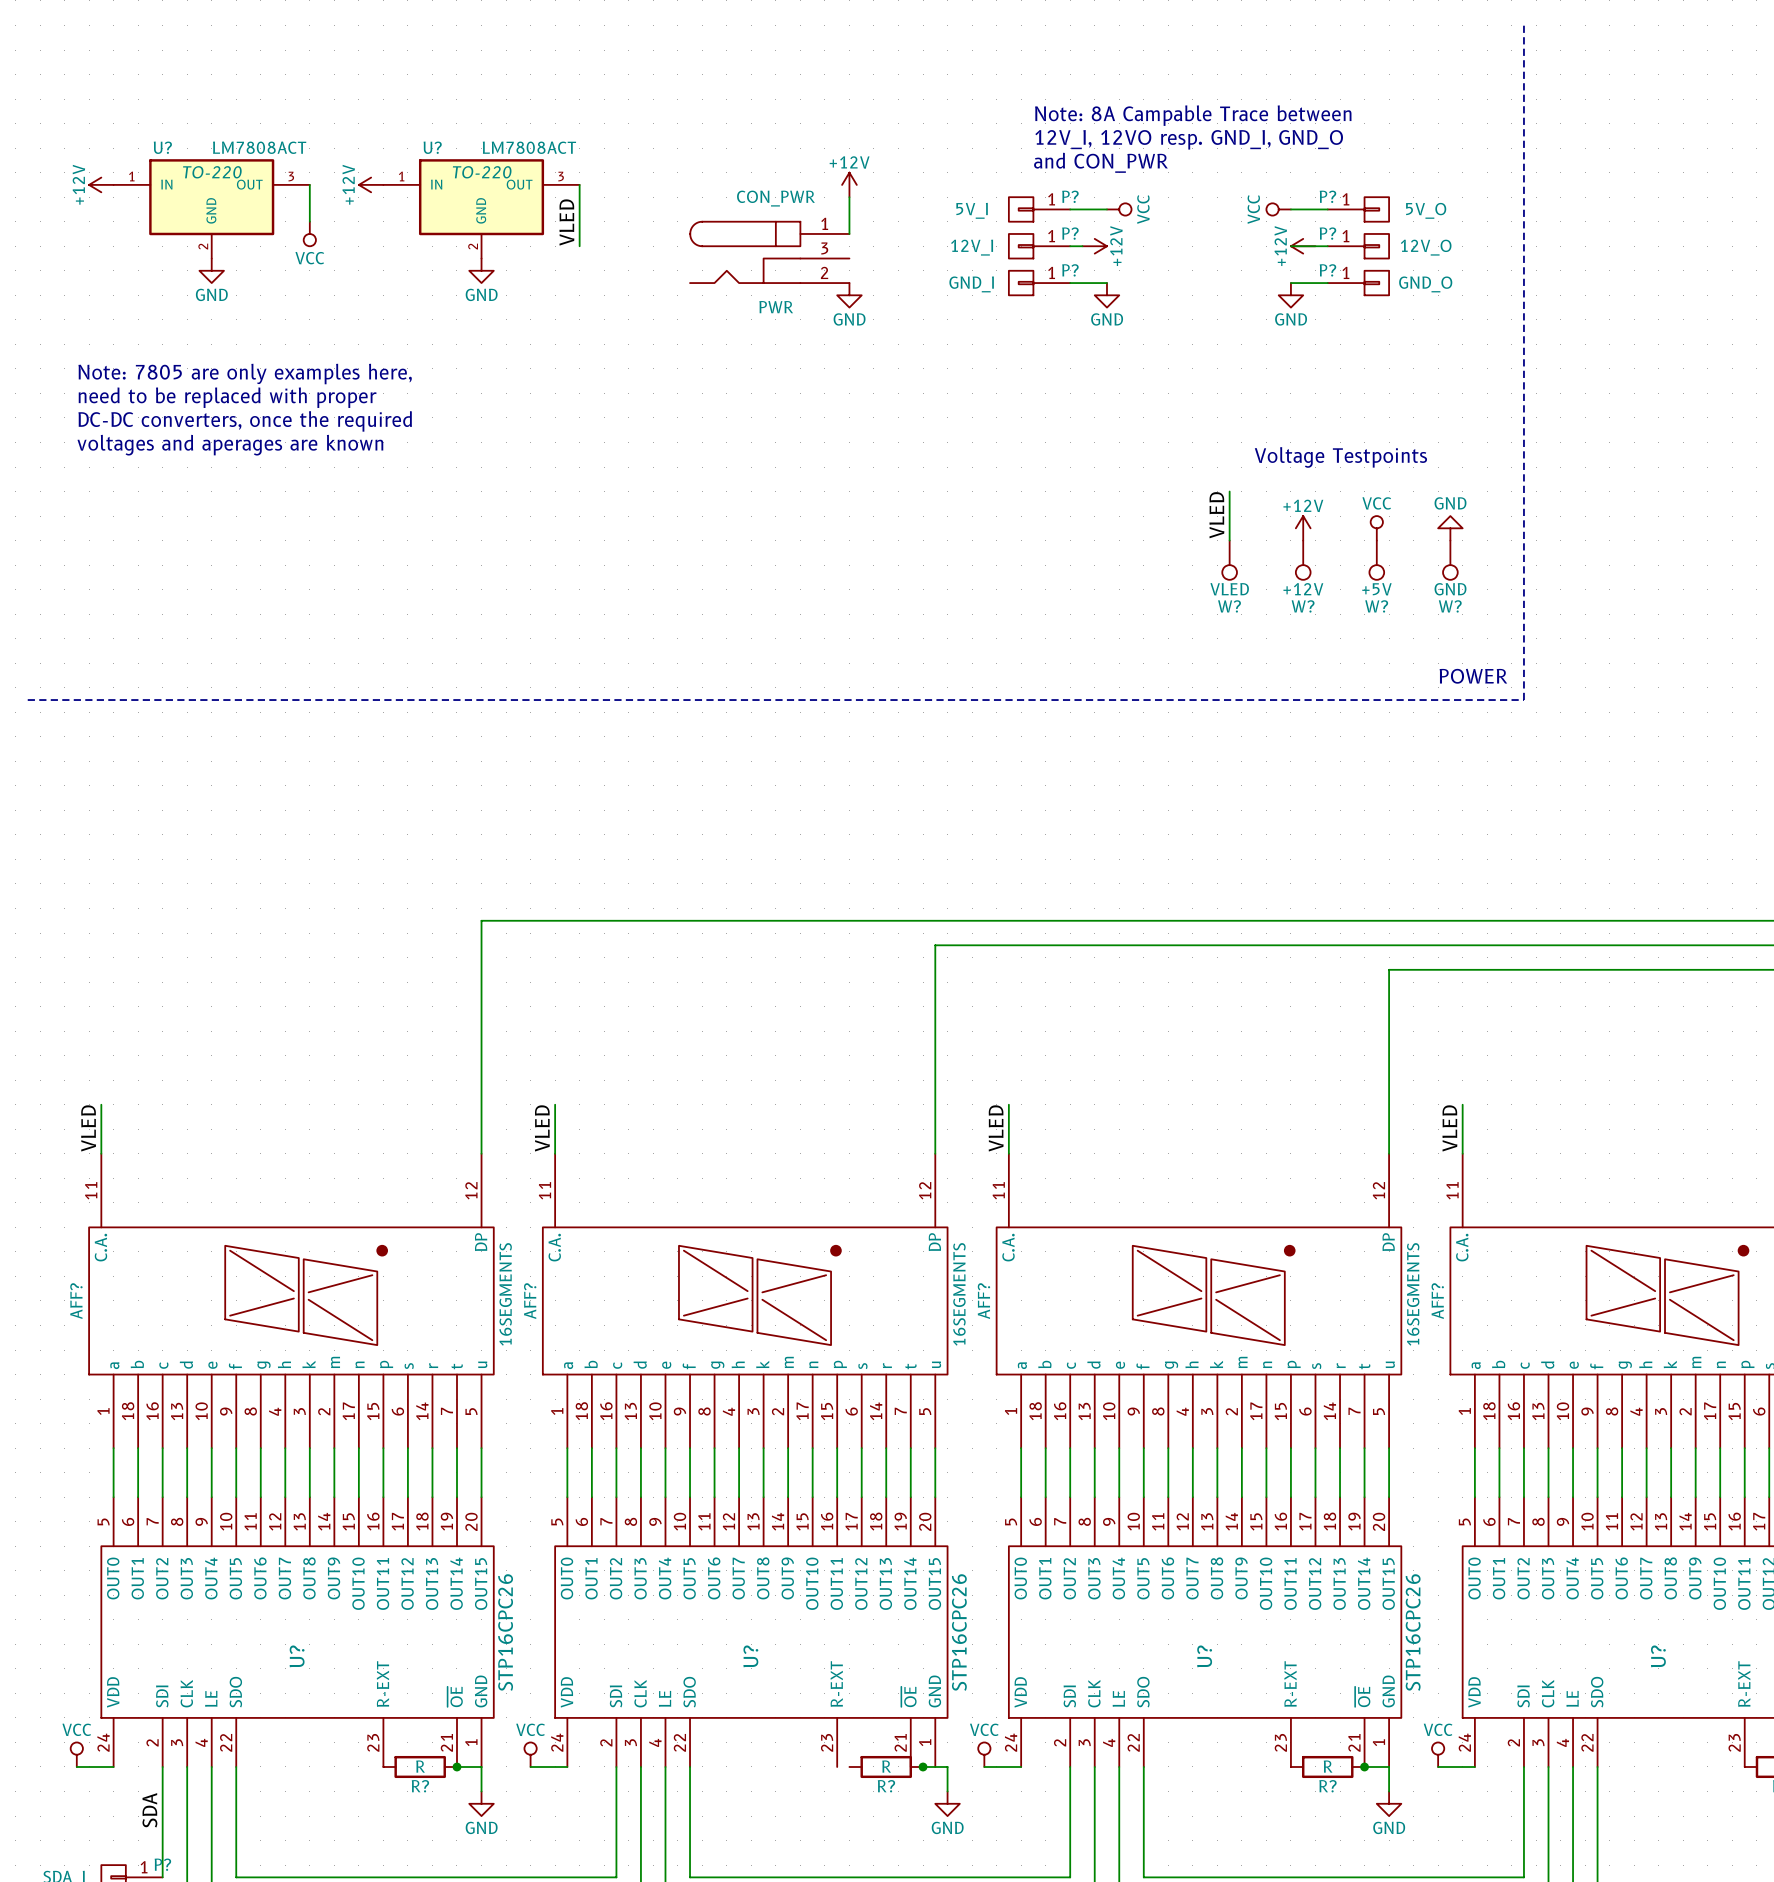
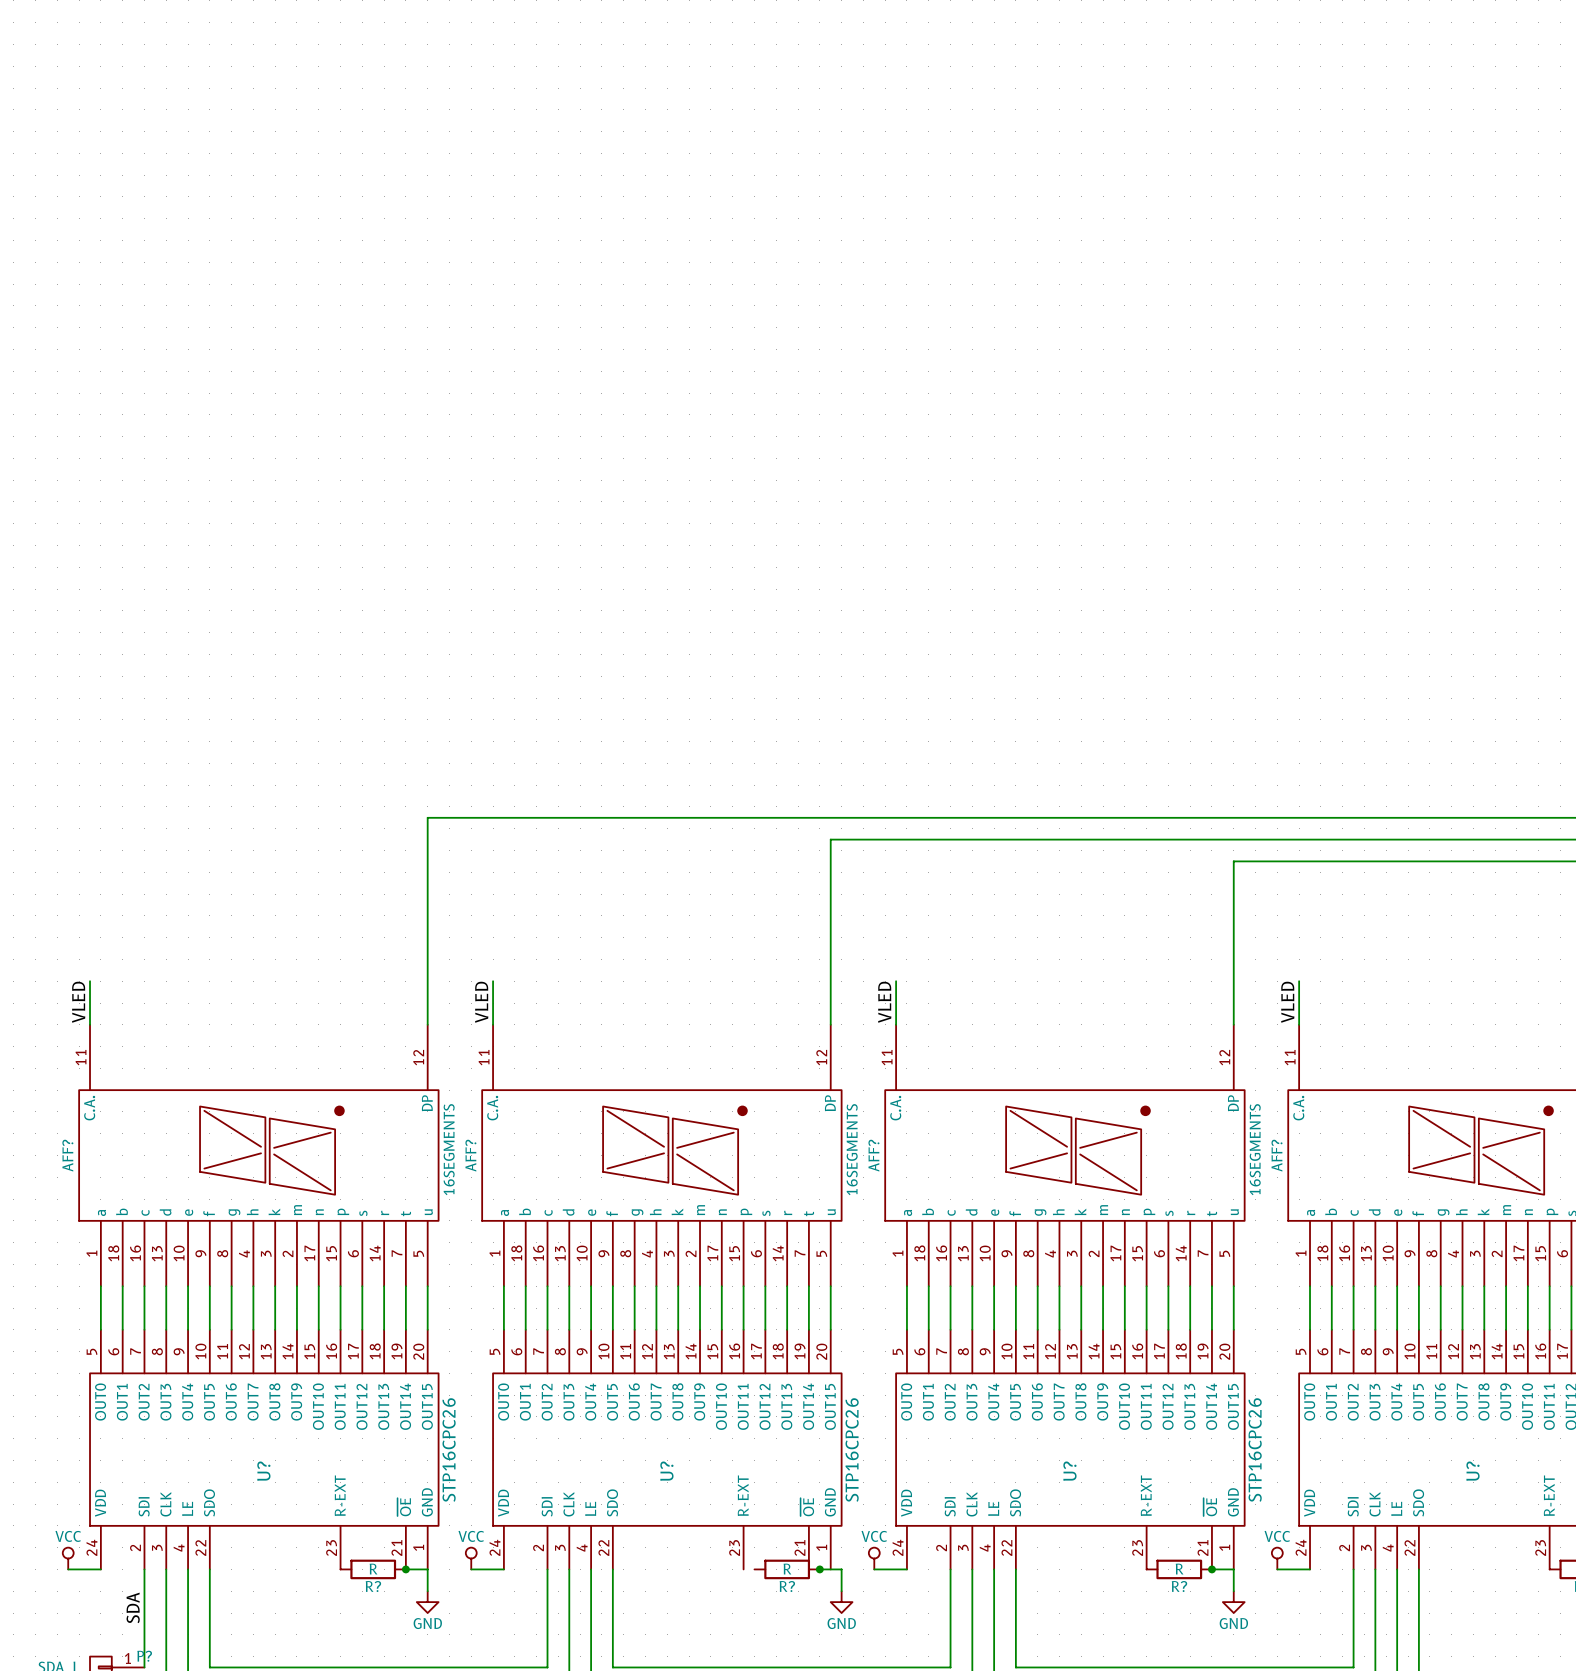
line: (1523, 25) (1523, 700) (27, 700) -> none
text: Note: 8A Campable Trace between (1193, 115) -> none
text: 12V_I, 12VO resp. GND_I, GND_O (1189, 139) -> none
text: and CON_PWR (1100, 162) -> none
power symbol: +12V (101, 184) -> none
wire: (309, 184) (309, 221) -> none
power symbol: +12V (371, 184) -> none
wire: (579, 184) (579, 246) -> none
power symbol: +12V (849, 184) -> none
wire: (849, 197) (849, 233) -> none
U?: LM7808ACT (211, 208) -> none
U?: LM7808ACT (481, 208) -> none
P?: 5V_I (1039, 209) -> none
wire: (1070, 209) (1106, 209) -> none
power symbol: VCC (1119, 209) -> none
power symbol: VCC (1278, 209) -> none
wire: (1290, 209) (1327, 209) -> none
P?: 5V_O (1358, 209) -> none
label: VLED (566, 222) -> none
power symbol: VCC (309, 233) -> none
P?: 12V_I (1039, 246) -> none
wire: (1070, 246) (1082, 246) -> none
power symbol: +12V (1094, 246) -> none
wire: (1290, 246) (1327, 246) -> none
power symbol: +12V (1303, 246) -> none
P?: 12V_O (1358, 246) -> none
CON_PWR: PWR (769, 252) -> none
power symbol: GND (211, 270) -> none
power symbol: GND (481, 270) -> none
P?: GND_I (1039, 283) -> none
wire: (1070, 283) (1106, 283) -> none
wire: (1290, 283) (1327, 283) -> none
P?: GND_O (1358, 283) -> none
power symbol: GND (849, 295) -> none
power symbol: GND (1106, 295) -> none
power symbol: GND (1290, 295) -> none
text: Note: 7805 are only examples here, (245, 374) -> none
text: need to be replaced with proper (227, 397) -> none
text: DC-DC converters, once the required (245, 421) -> none
text: voltages and aperages are known (230, 445) -> none
text: Voltage Testpoints (1340, 457) -> none
wire: (1229, 491) (1229, 540) -> none
label: VLED (1216, 515) -> none
power symbol: +12V (1303, 528) -> none
power symbol: VCC (1376, 528) -> none
power symbol: GND (1450, 528) -> none
W?: VLED (1229, 560) -> none
W?: +12V (1303, 560) -> none
W?: +5V (1376, 560) -> none
W?: GND (1450, 560) -> none
text: POWER (1473, 676) -> none

